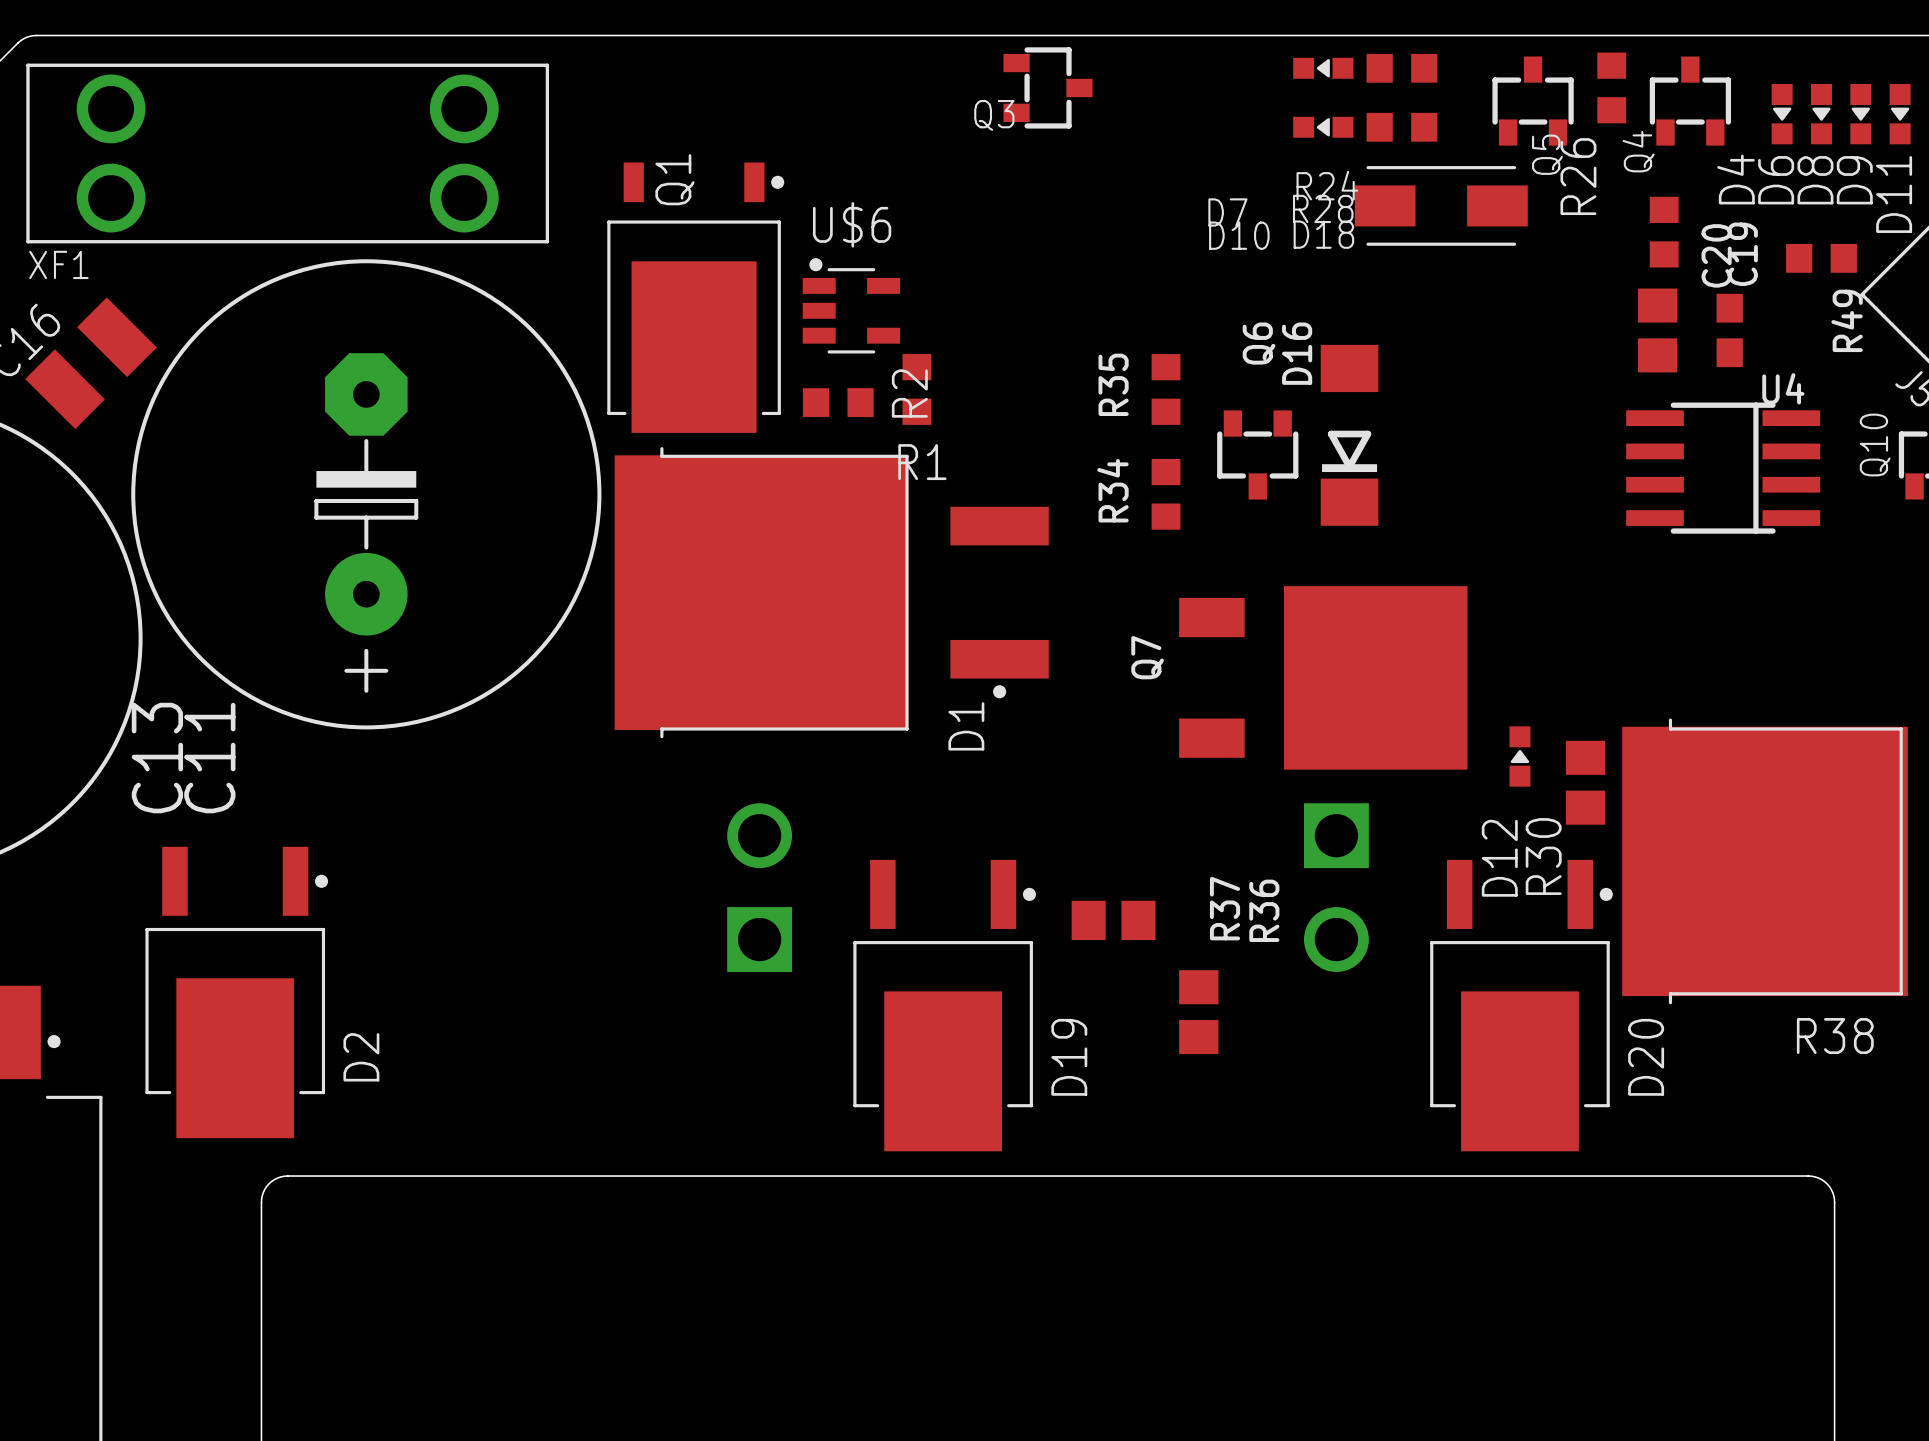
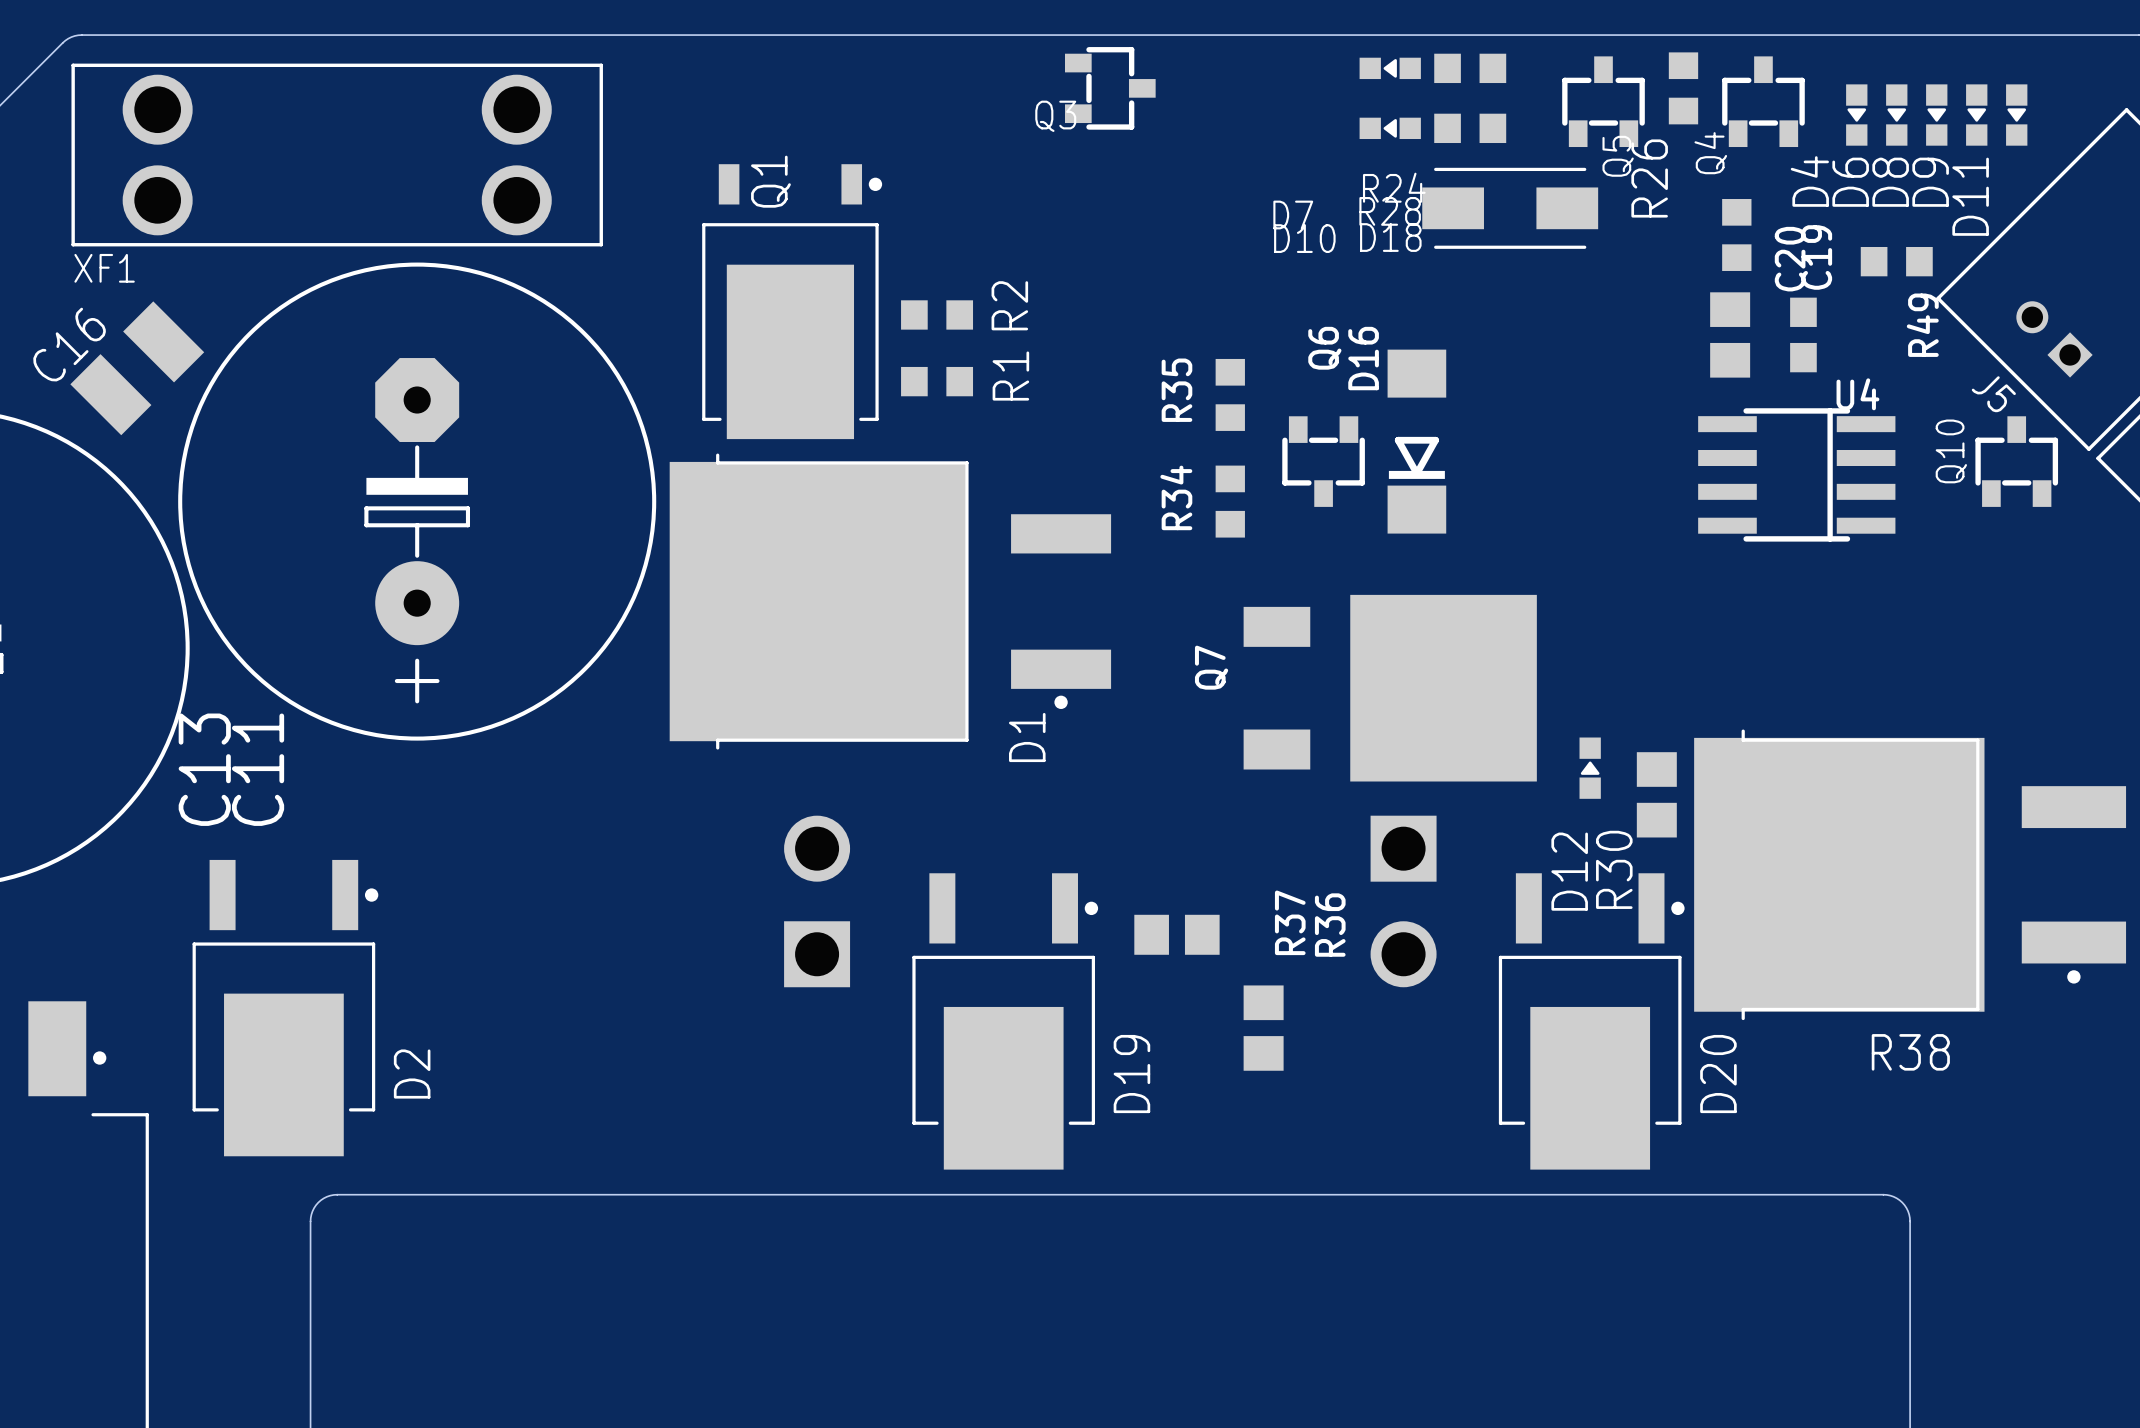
Q1 position: (695, 297) -> (792, 301)
U$6: (851, 305) -> none
R1 rotation: 0° (916, 389) -> 90° clockwise (937, 381)
R2 position: (838, 402) -> (937, 314)
R1 name position: R1 (922, 462) -> R1 (1010, 376)

